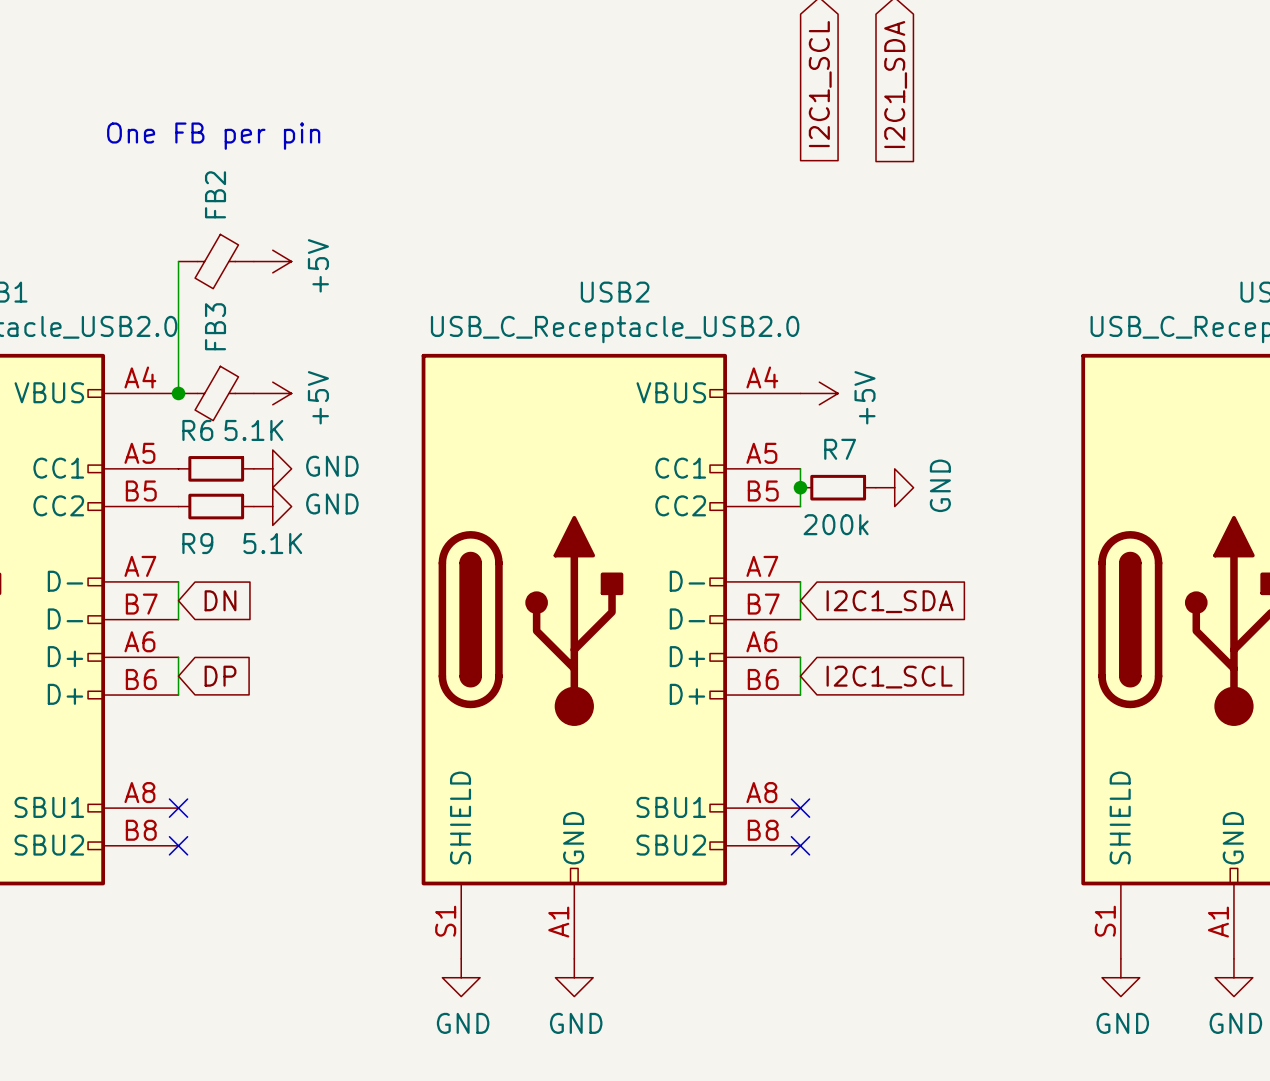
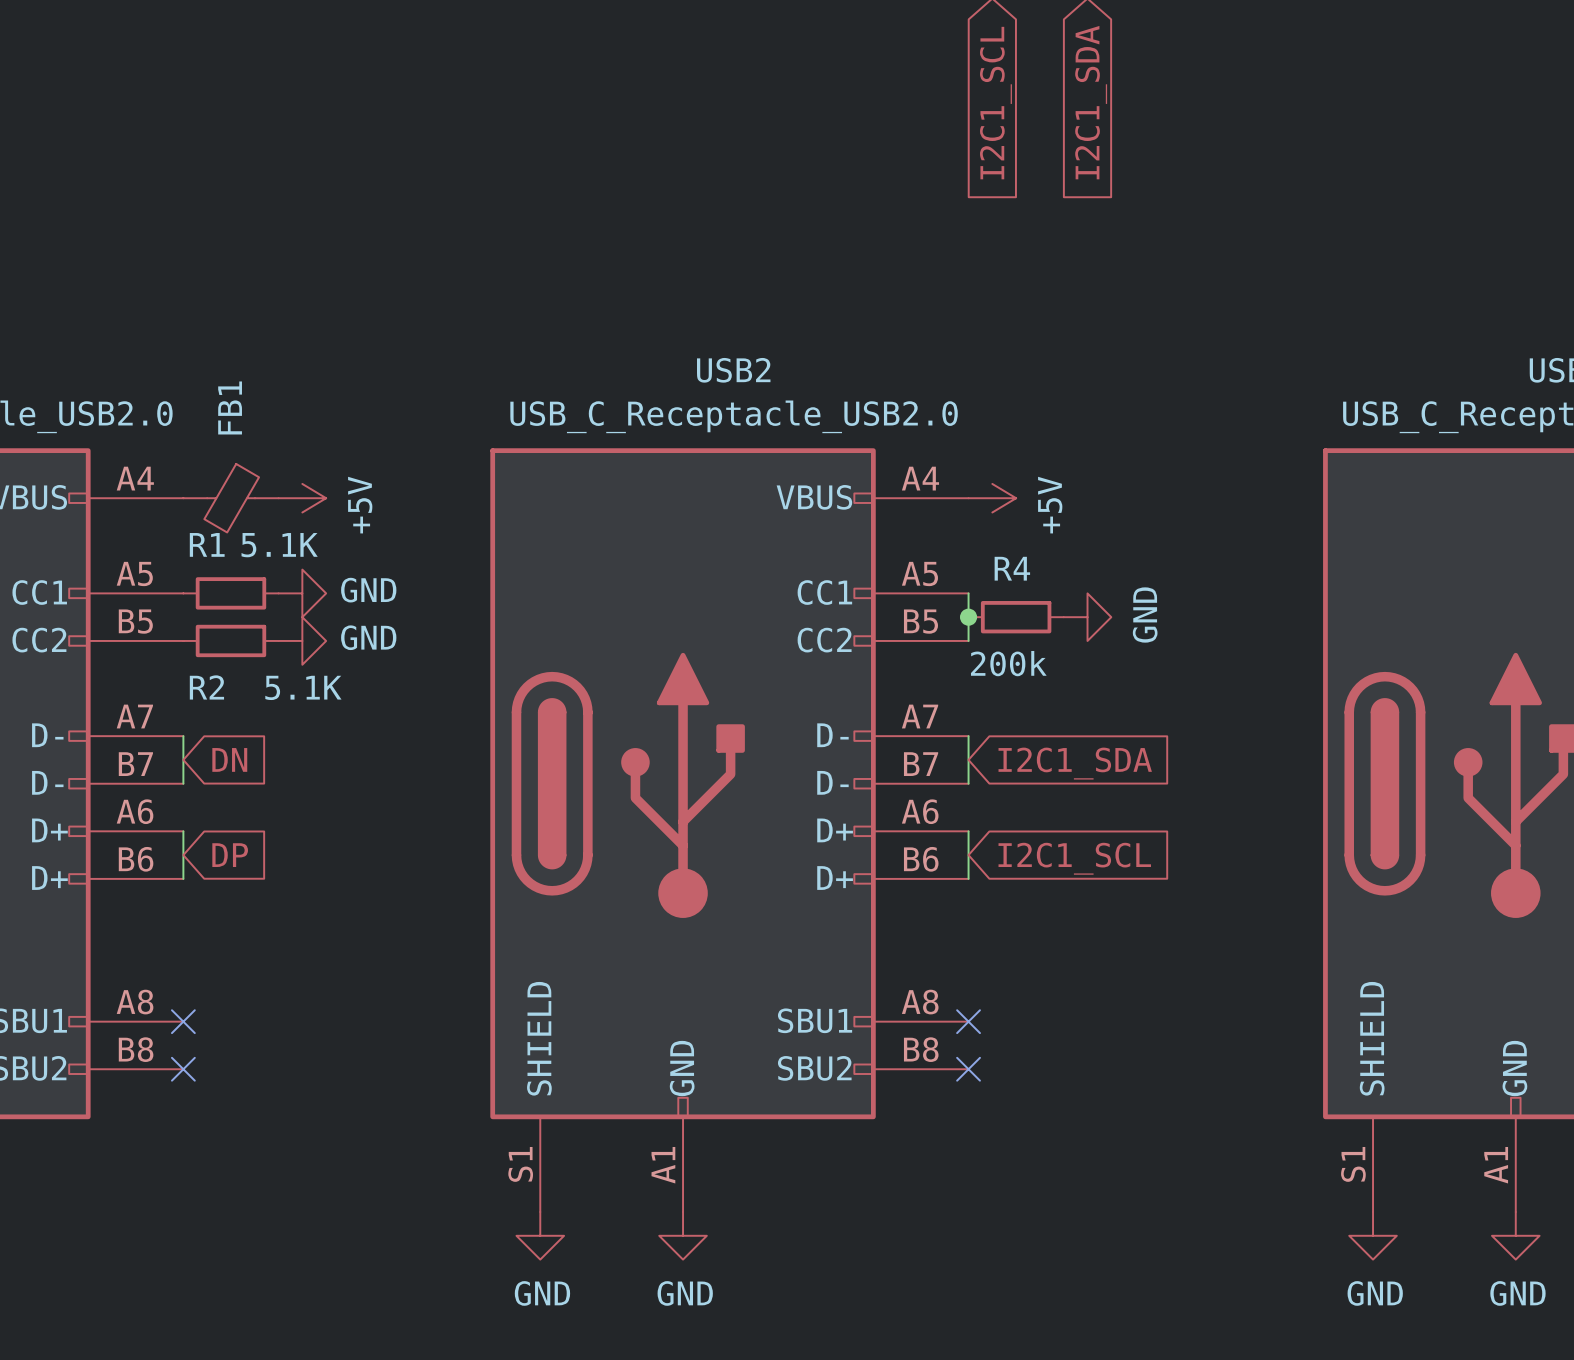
text: One FB per pin (213, 136) -> none
wire: (178, 261) (178, 393) -> none
FB2: (216, 261) -> none
power symbol: +5V (272, 261) -> none
FB3 name: FB3 (215, 326) -> FB1 (230, 407)
junction: (178, 393) -> none
R6 name: R6 (197, 430) -> R1 (207, 544)
R7 name: R7 (840, 449) -> R4 (1012, 568)
R9 name: R9 (197, 543) -> R2 (206, 687)

